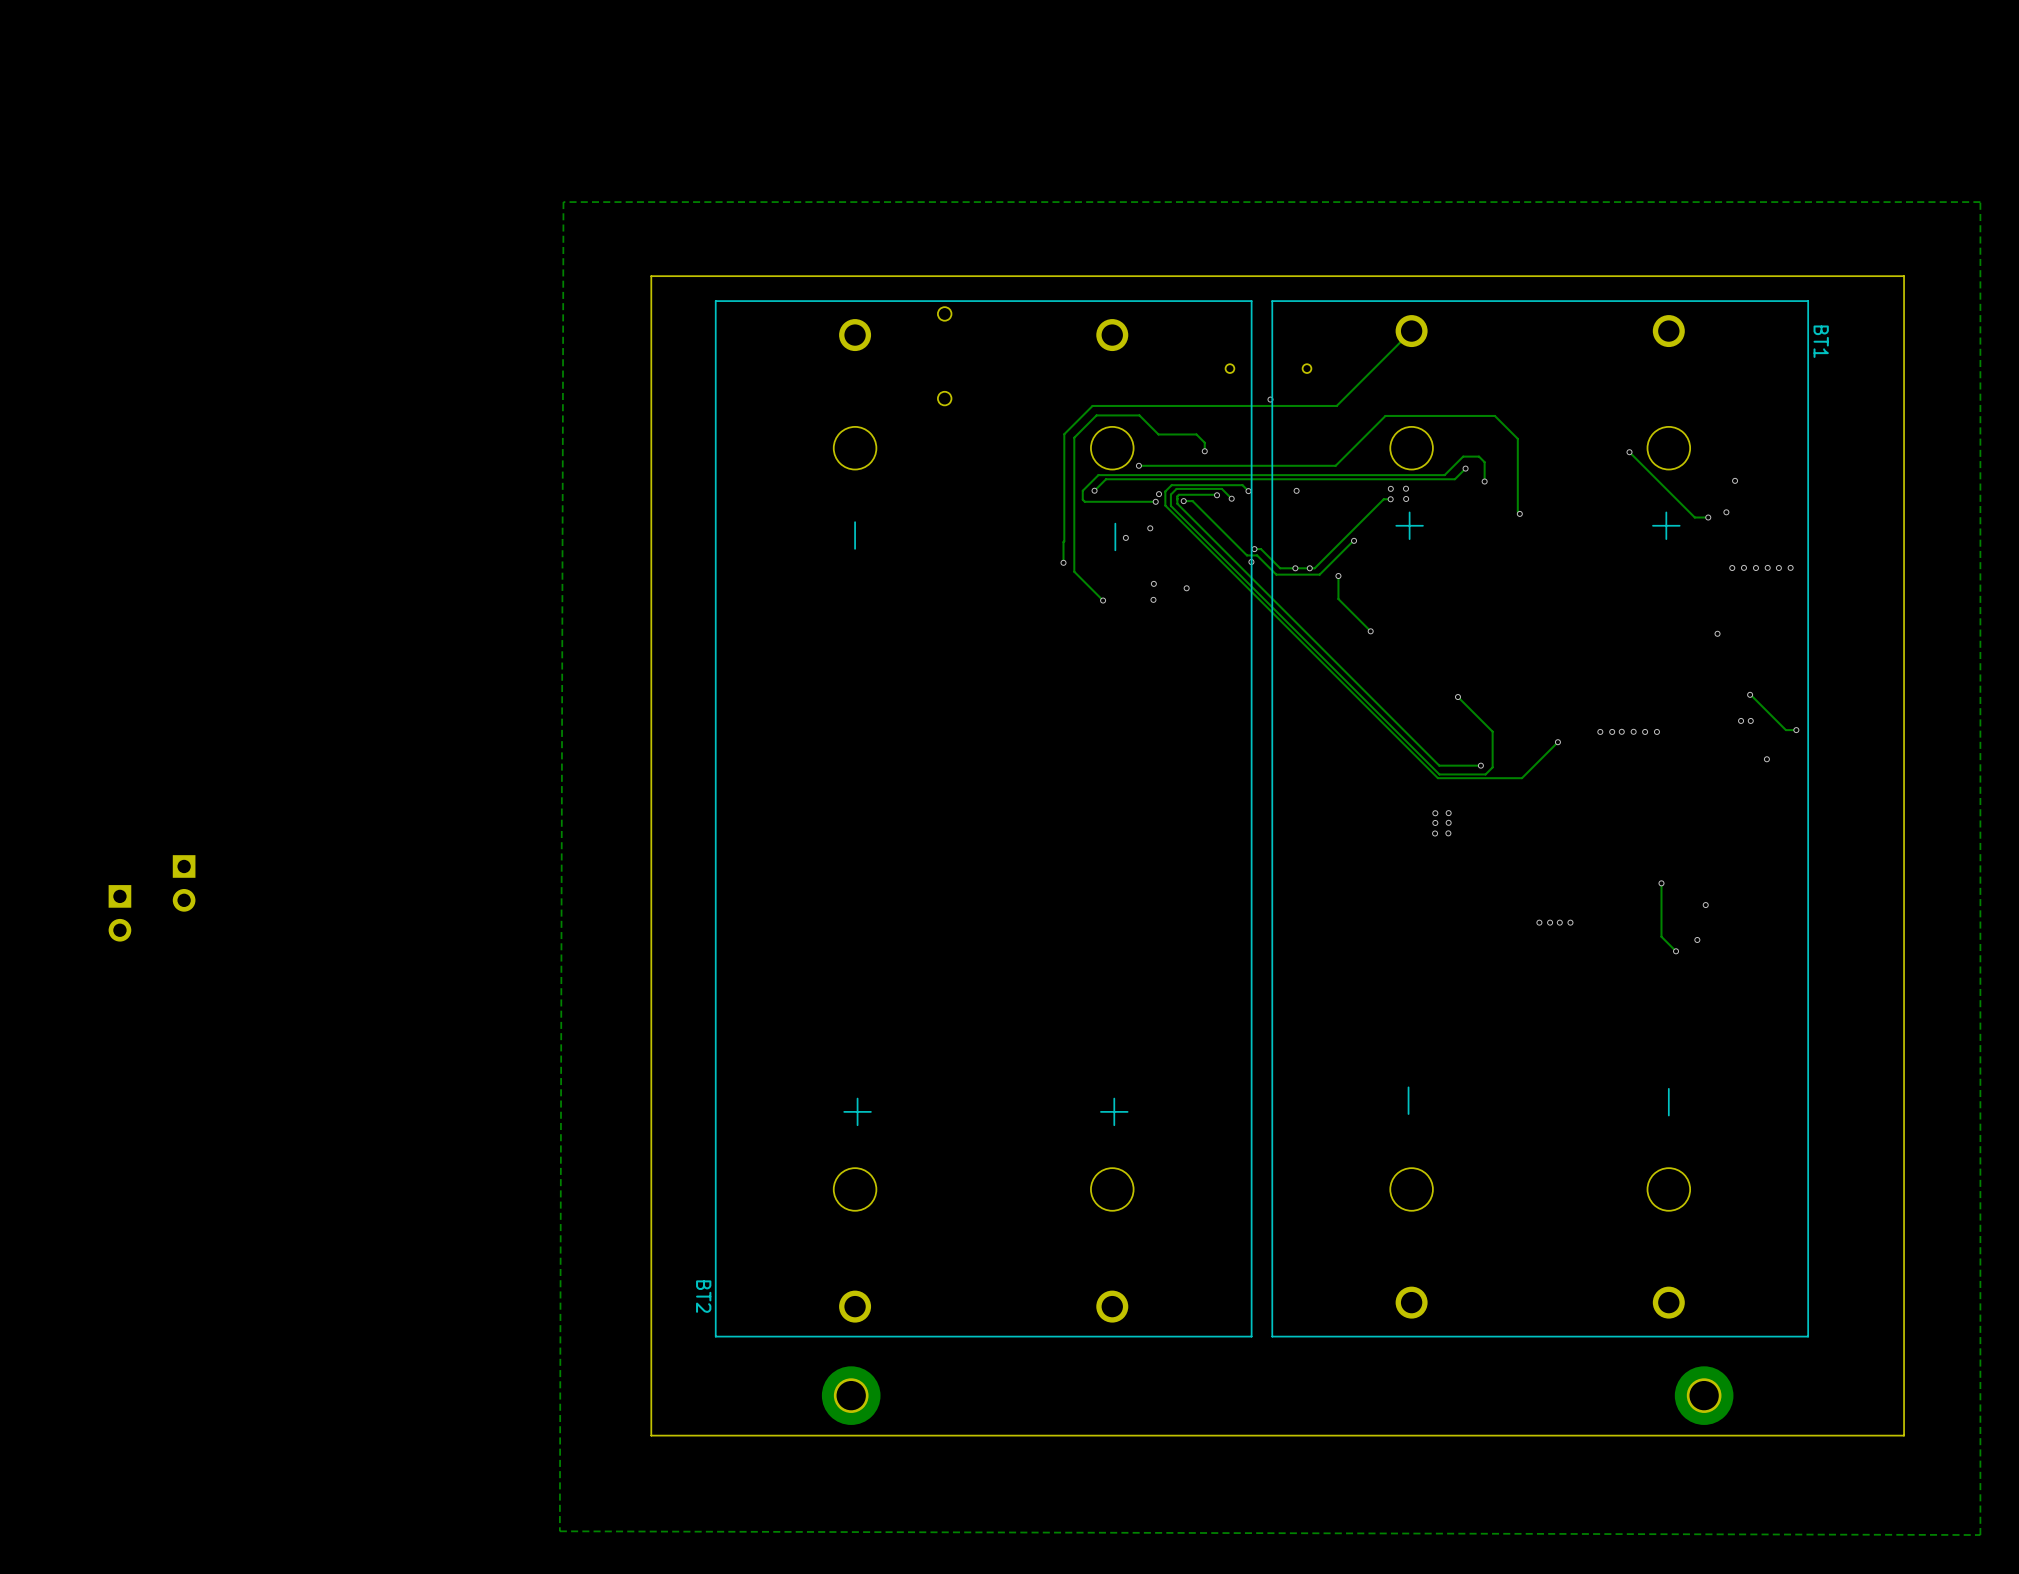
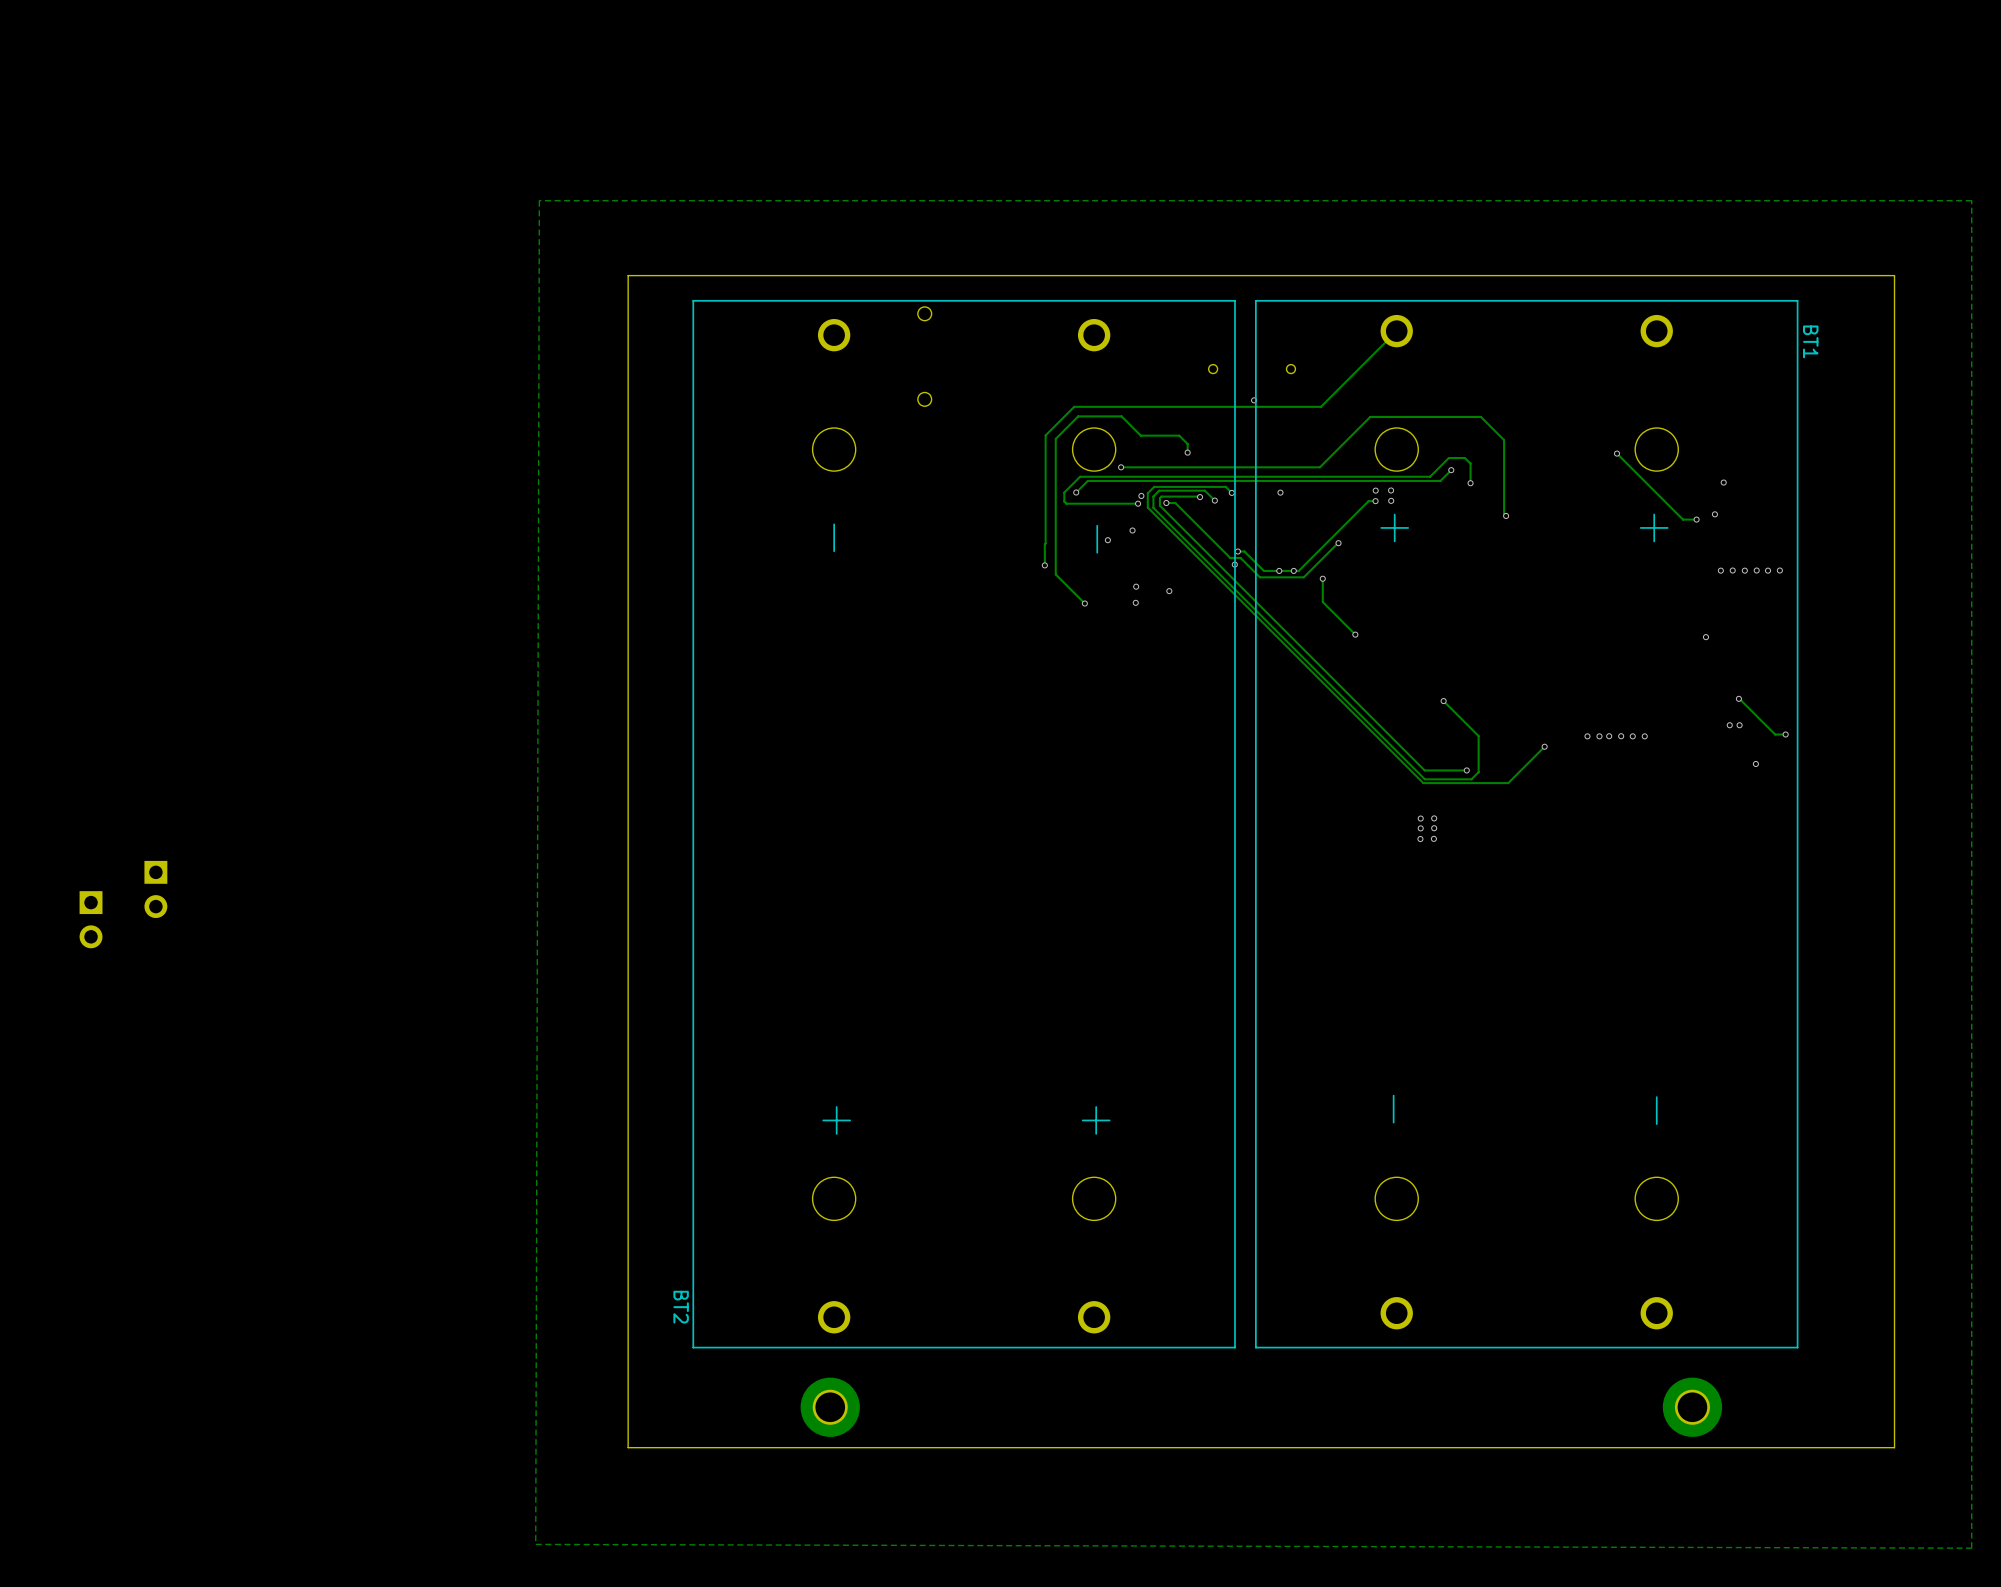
track: (1661, 883) (1661, 936) (1676, 951) -> none
via: (1661, 883) -> none
via: (1705, 905) -> none
via: (1539, 922) -> none
via: (1550, 922) -> none
via: (1559, 922) -> none
via: (1570, 922) -> none
via: (1697, 939) -> none
via: (1676, 951) -> none

